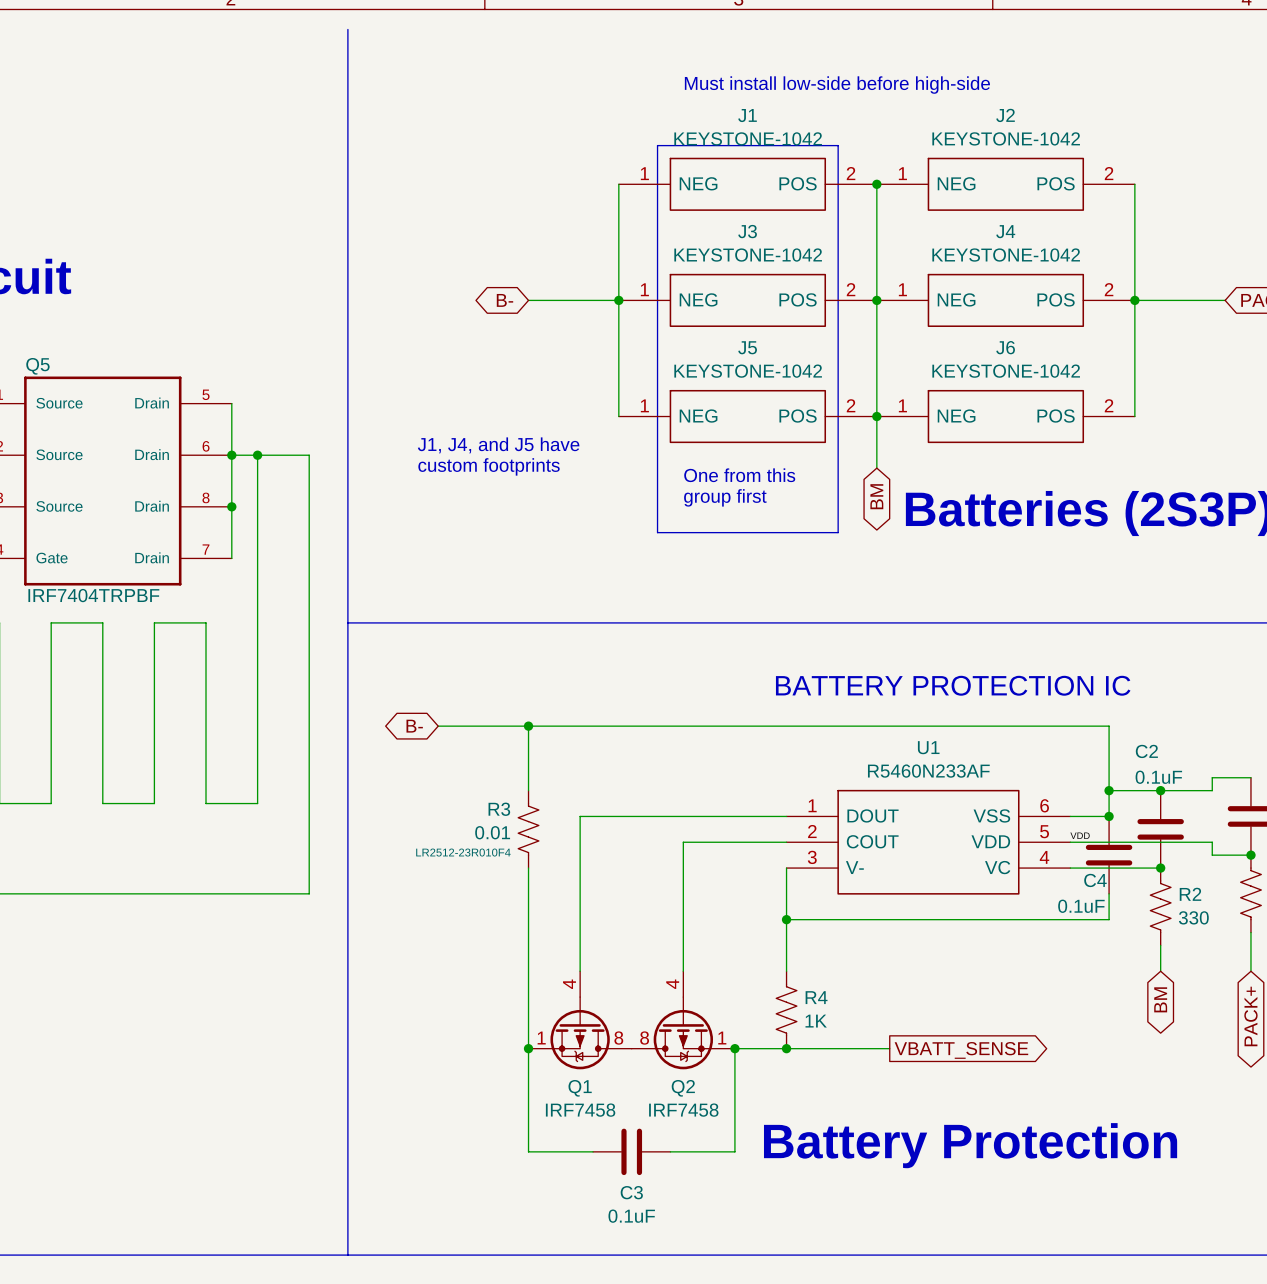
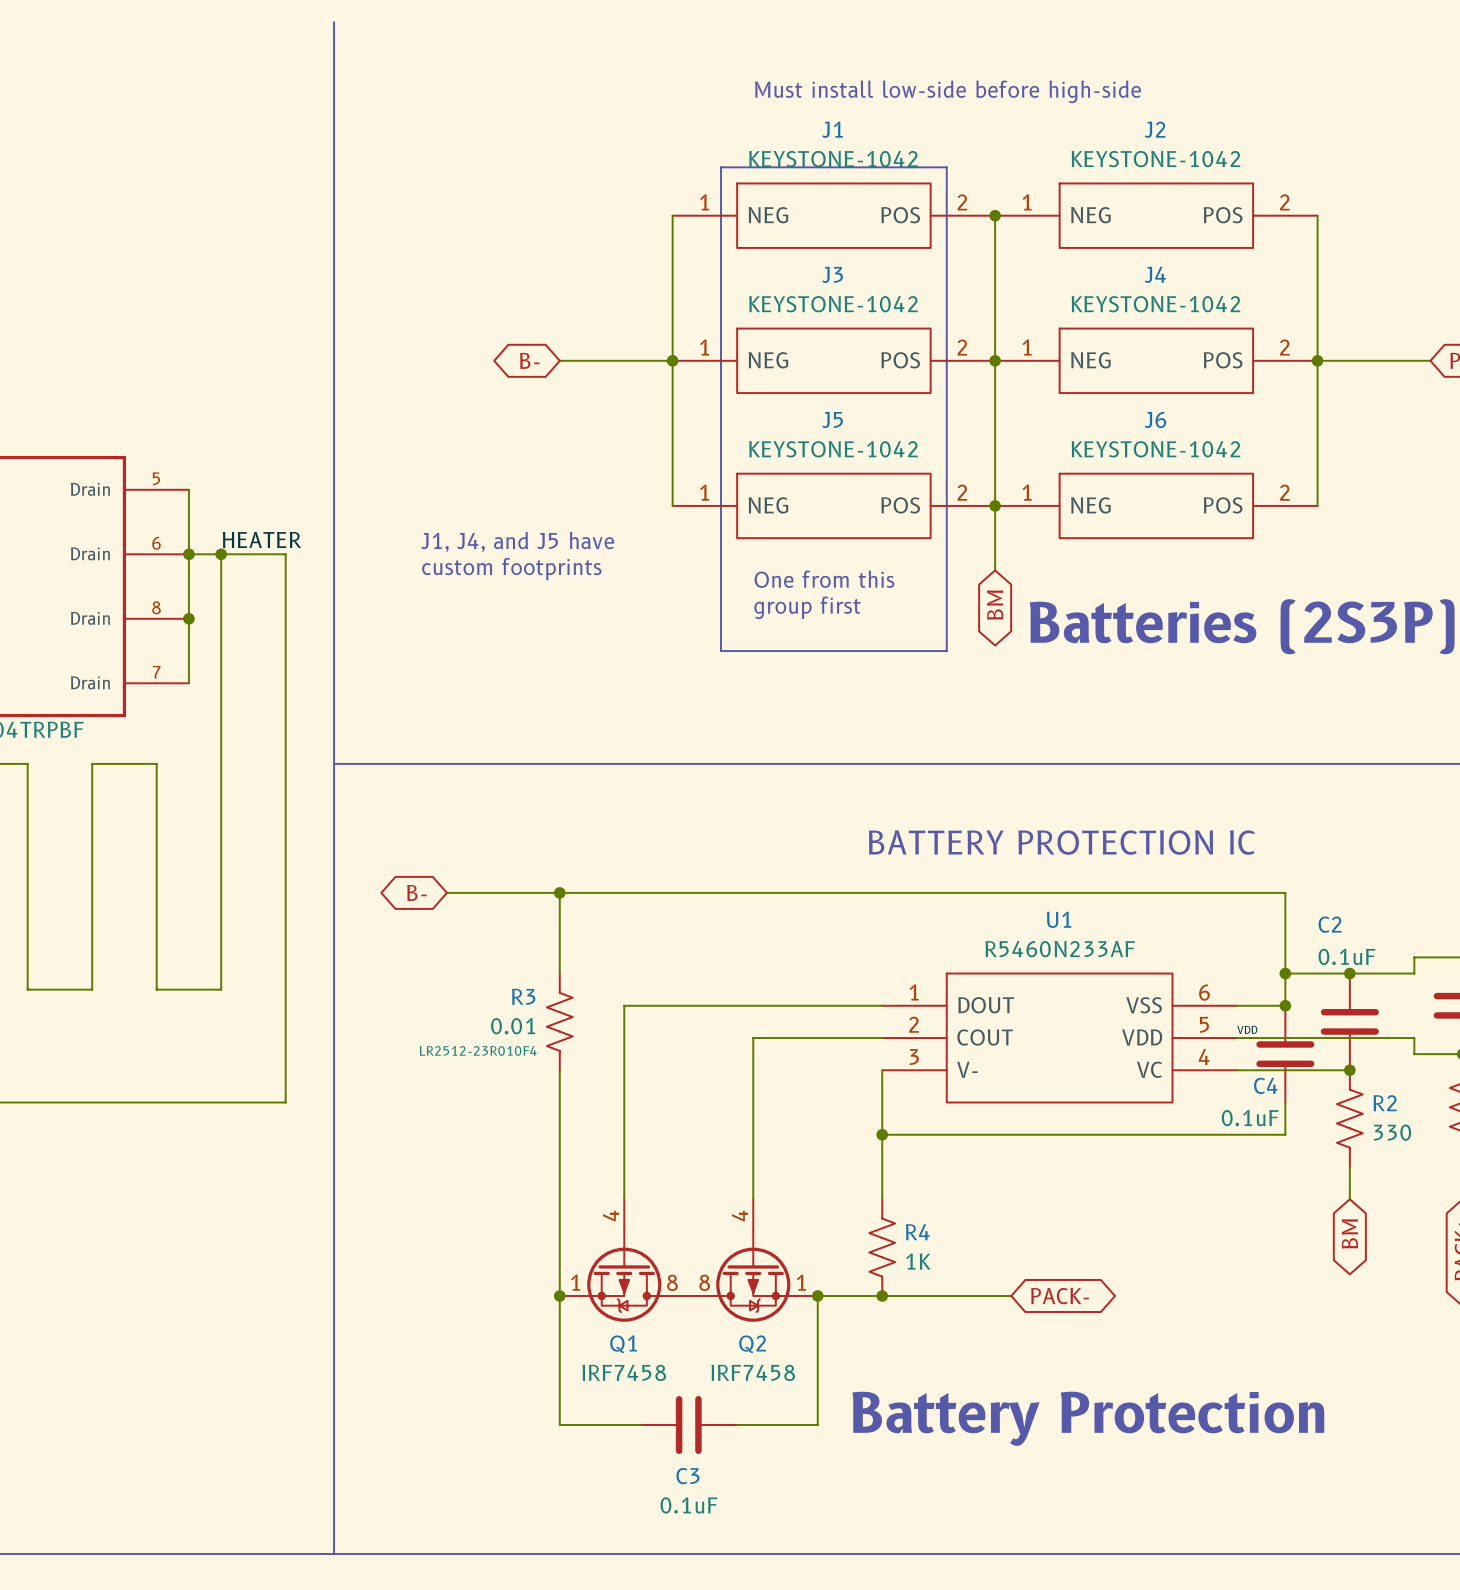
label: none -> HEATER (261, 539)
global label shape: output (961, 1050) -> bidirectional (1059, 1296)
global label: VBATT_SENSE (961, 1050) -> PACK- (1059, 1296)

